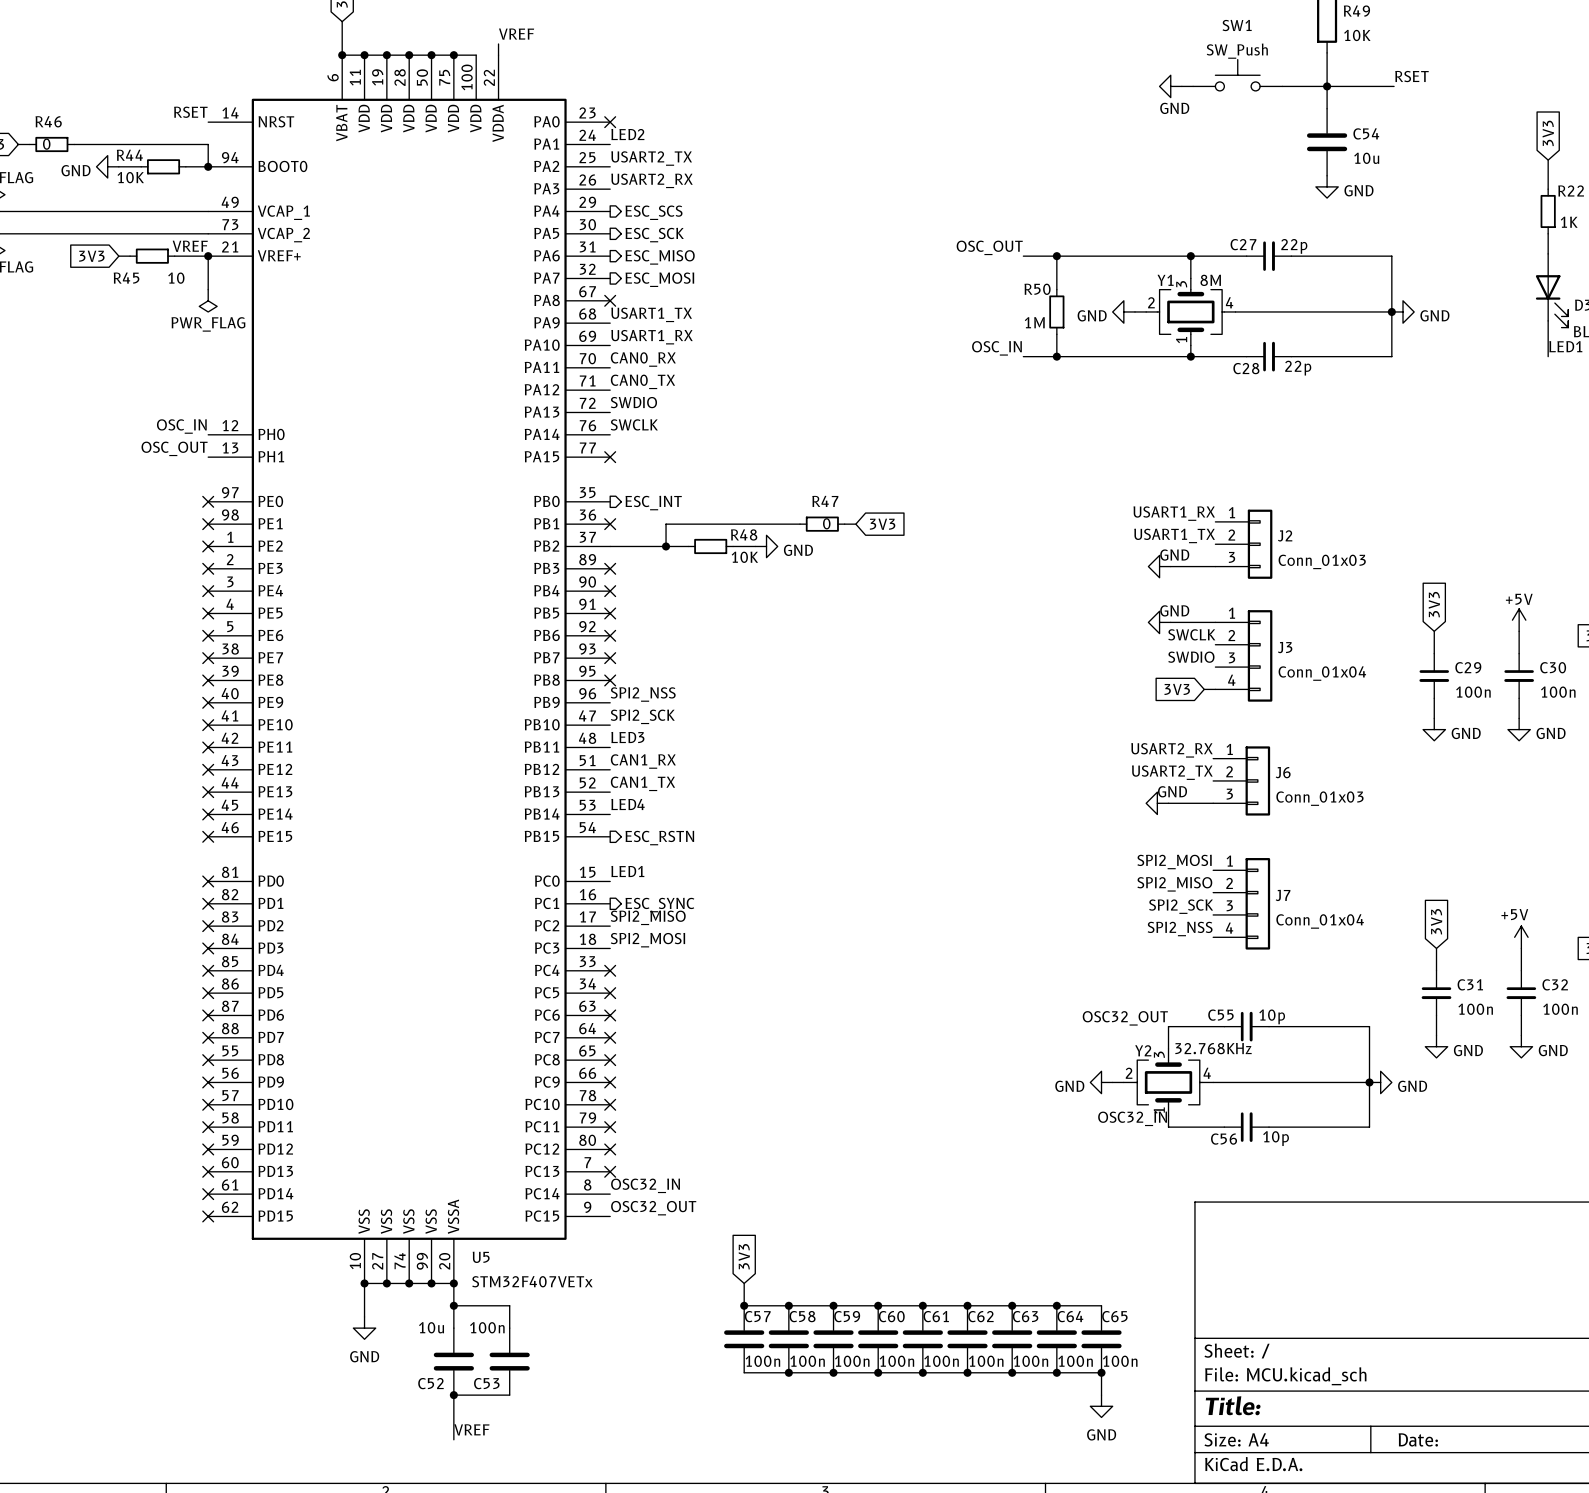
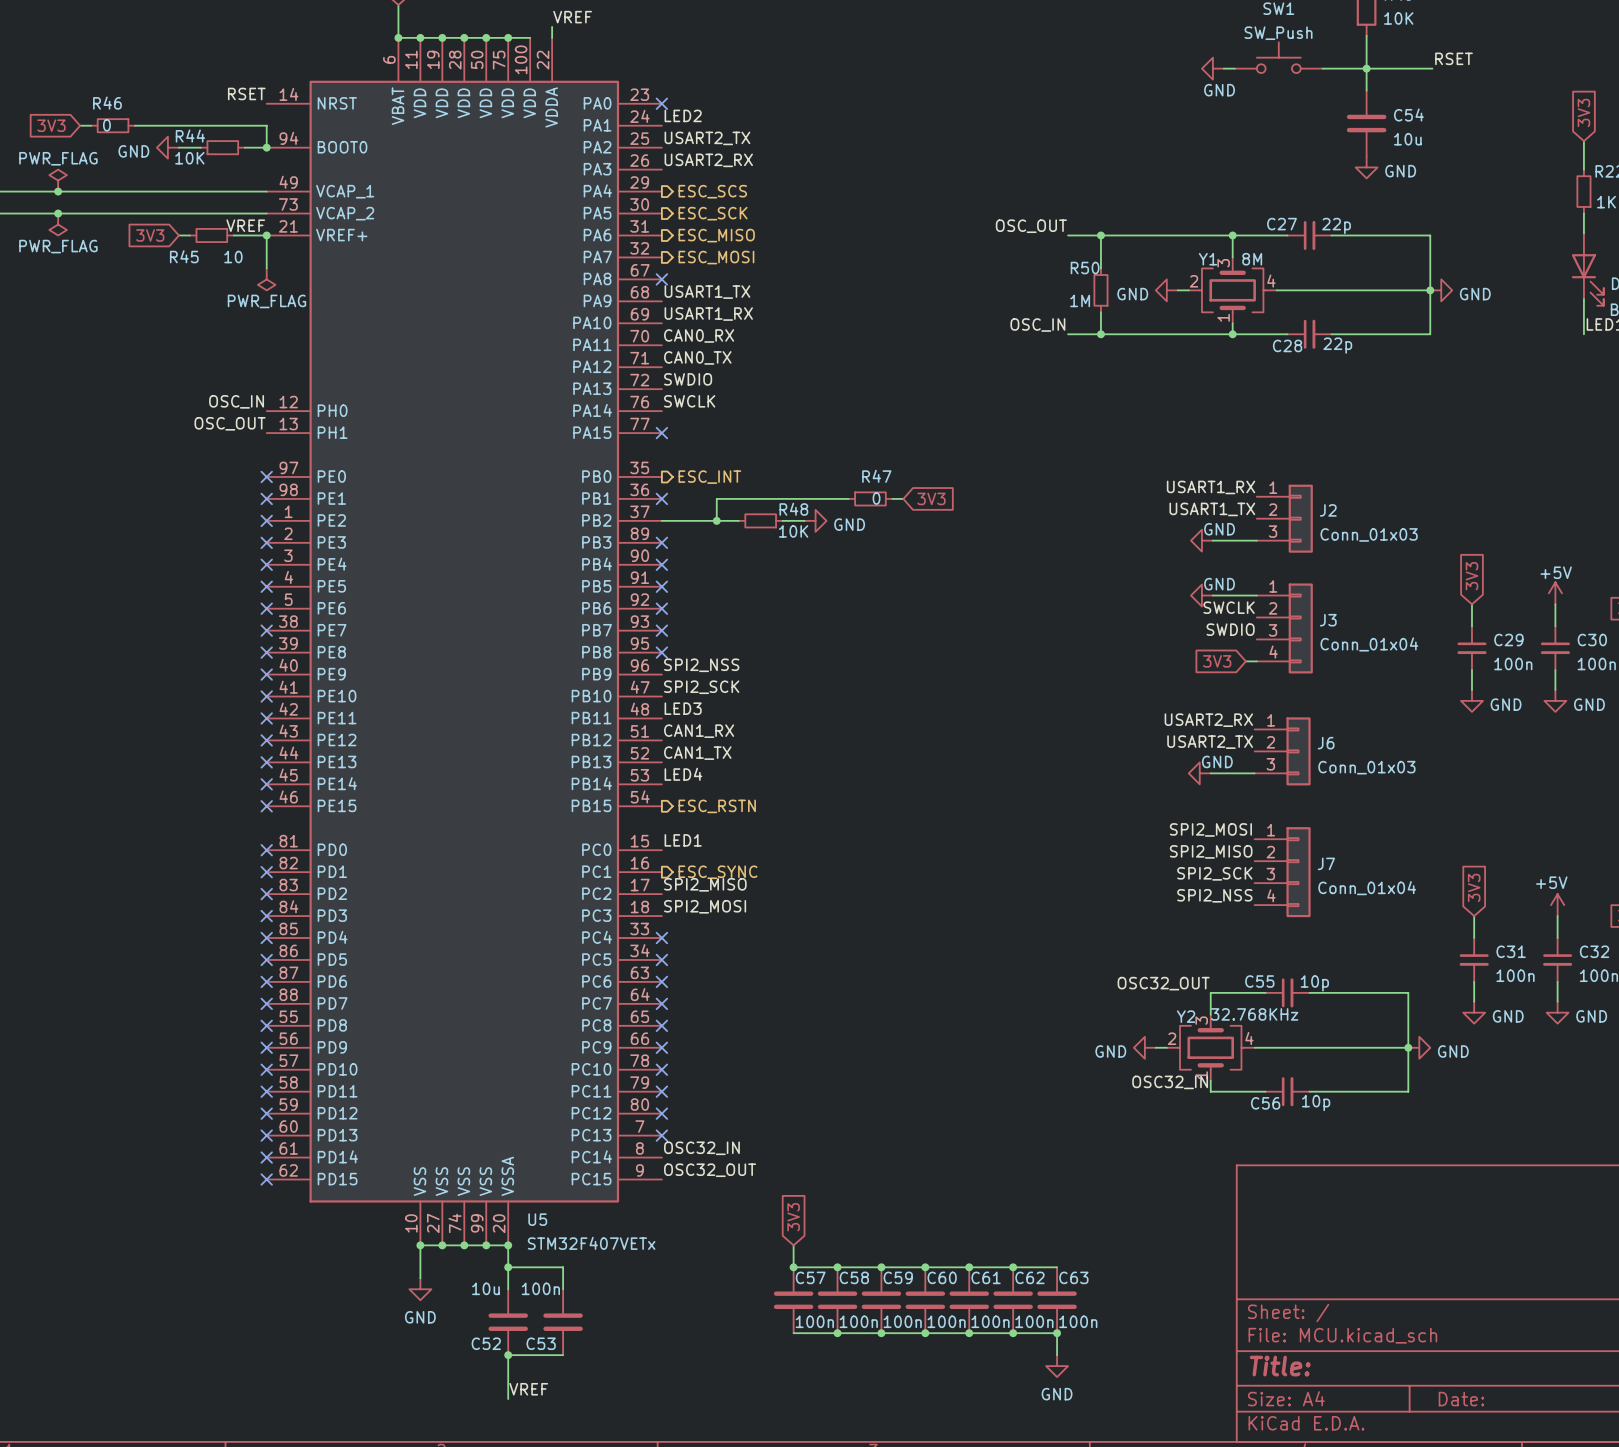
wire: (1012, 1305) (1101, 1305) -> none
junction: (1012, 1305) -> none
junction: (1056, 1305) -> none
C64: 100n (1056, 1339) -> none
C65: 100n (1101, 1339) -> none
wire: (1012, 1372) (1101, 1372) (1101, 1395) -> (1057, 1333) (1057, 1355)
junction: (1056, 1372) -> none
junction: (1101, 1372) -> none
power symbol position: GND (1101, 1406) -> GND (1057, 1366)

